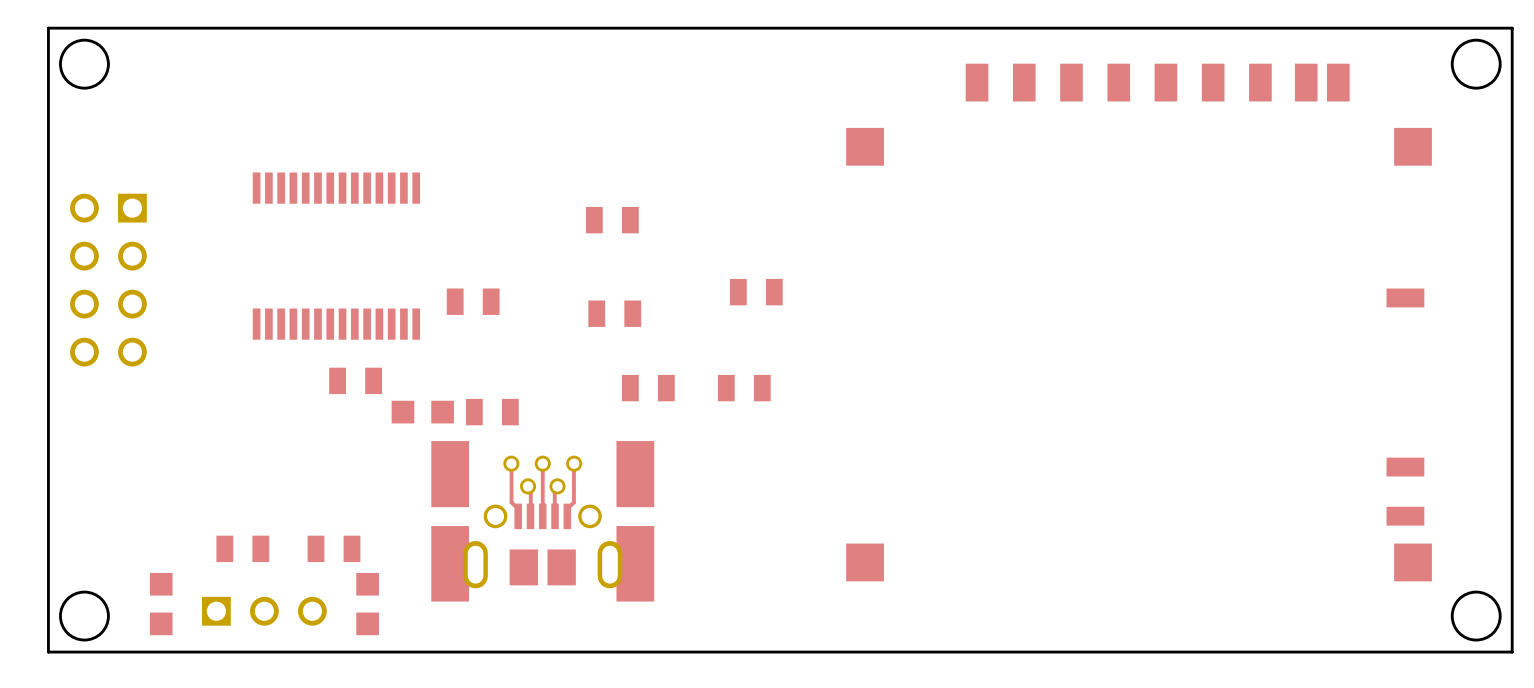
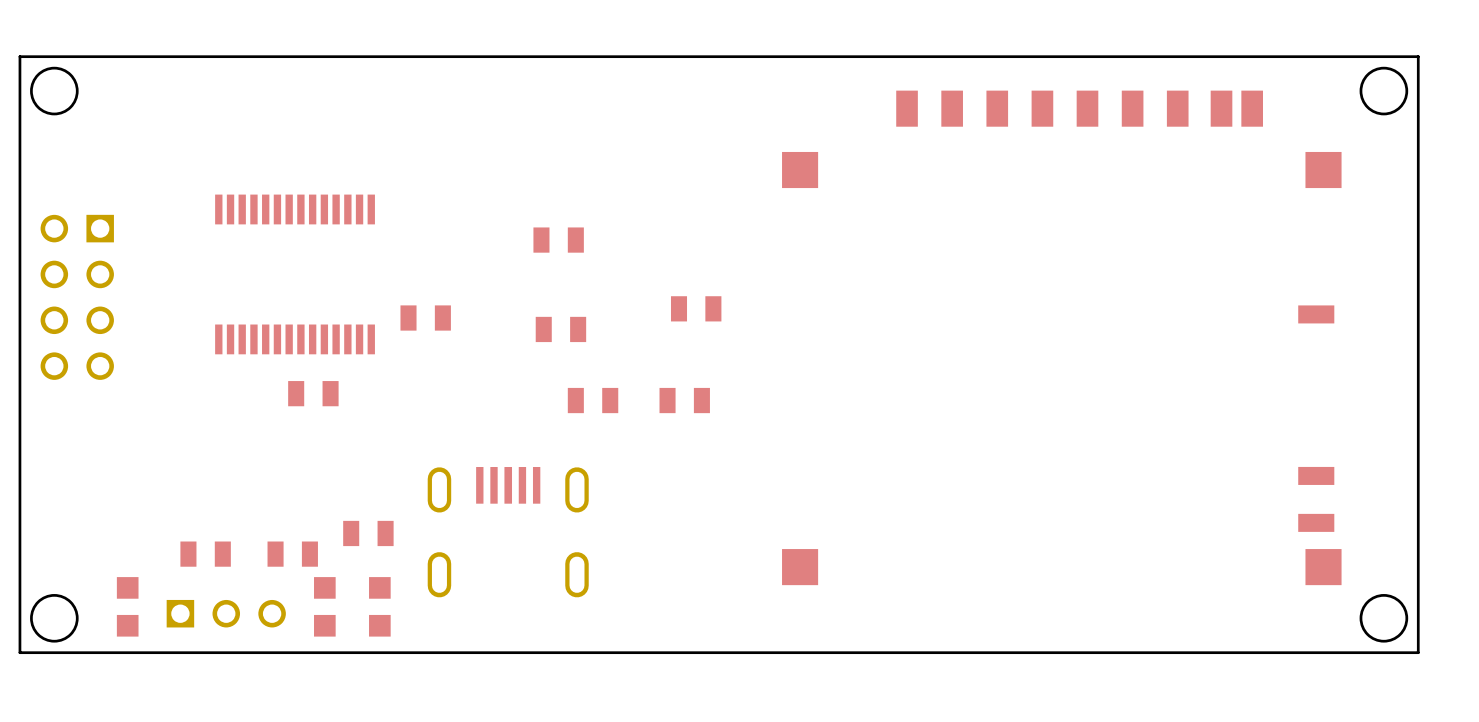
part rotation: 0° (422, 412) -> 90° clockwise (379, 606)
part position: (422, 412) -> (379, 606)
part position: (492, 412) -> (368, 533)
part footprint: [431, 441, 655, 602] -> [427, 467, 589, 598]

